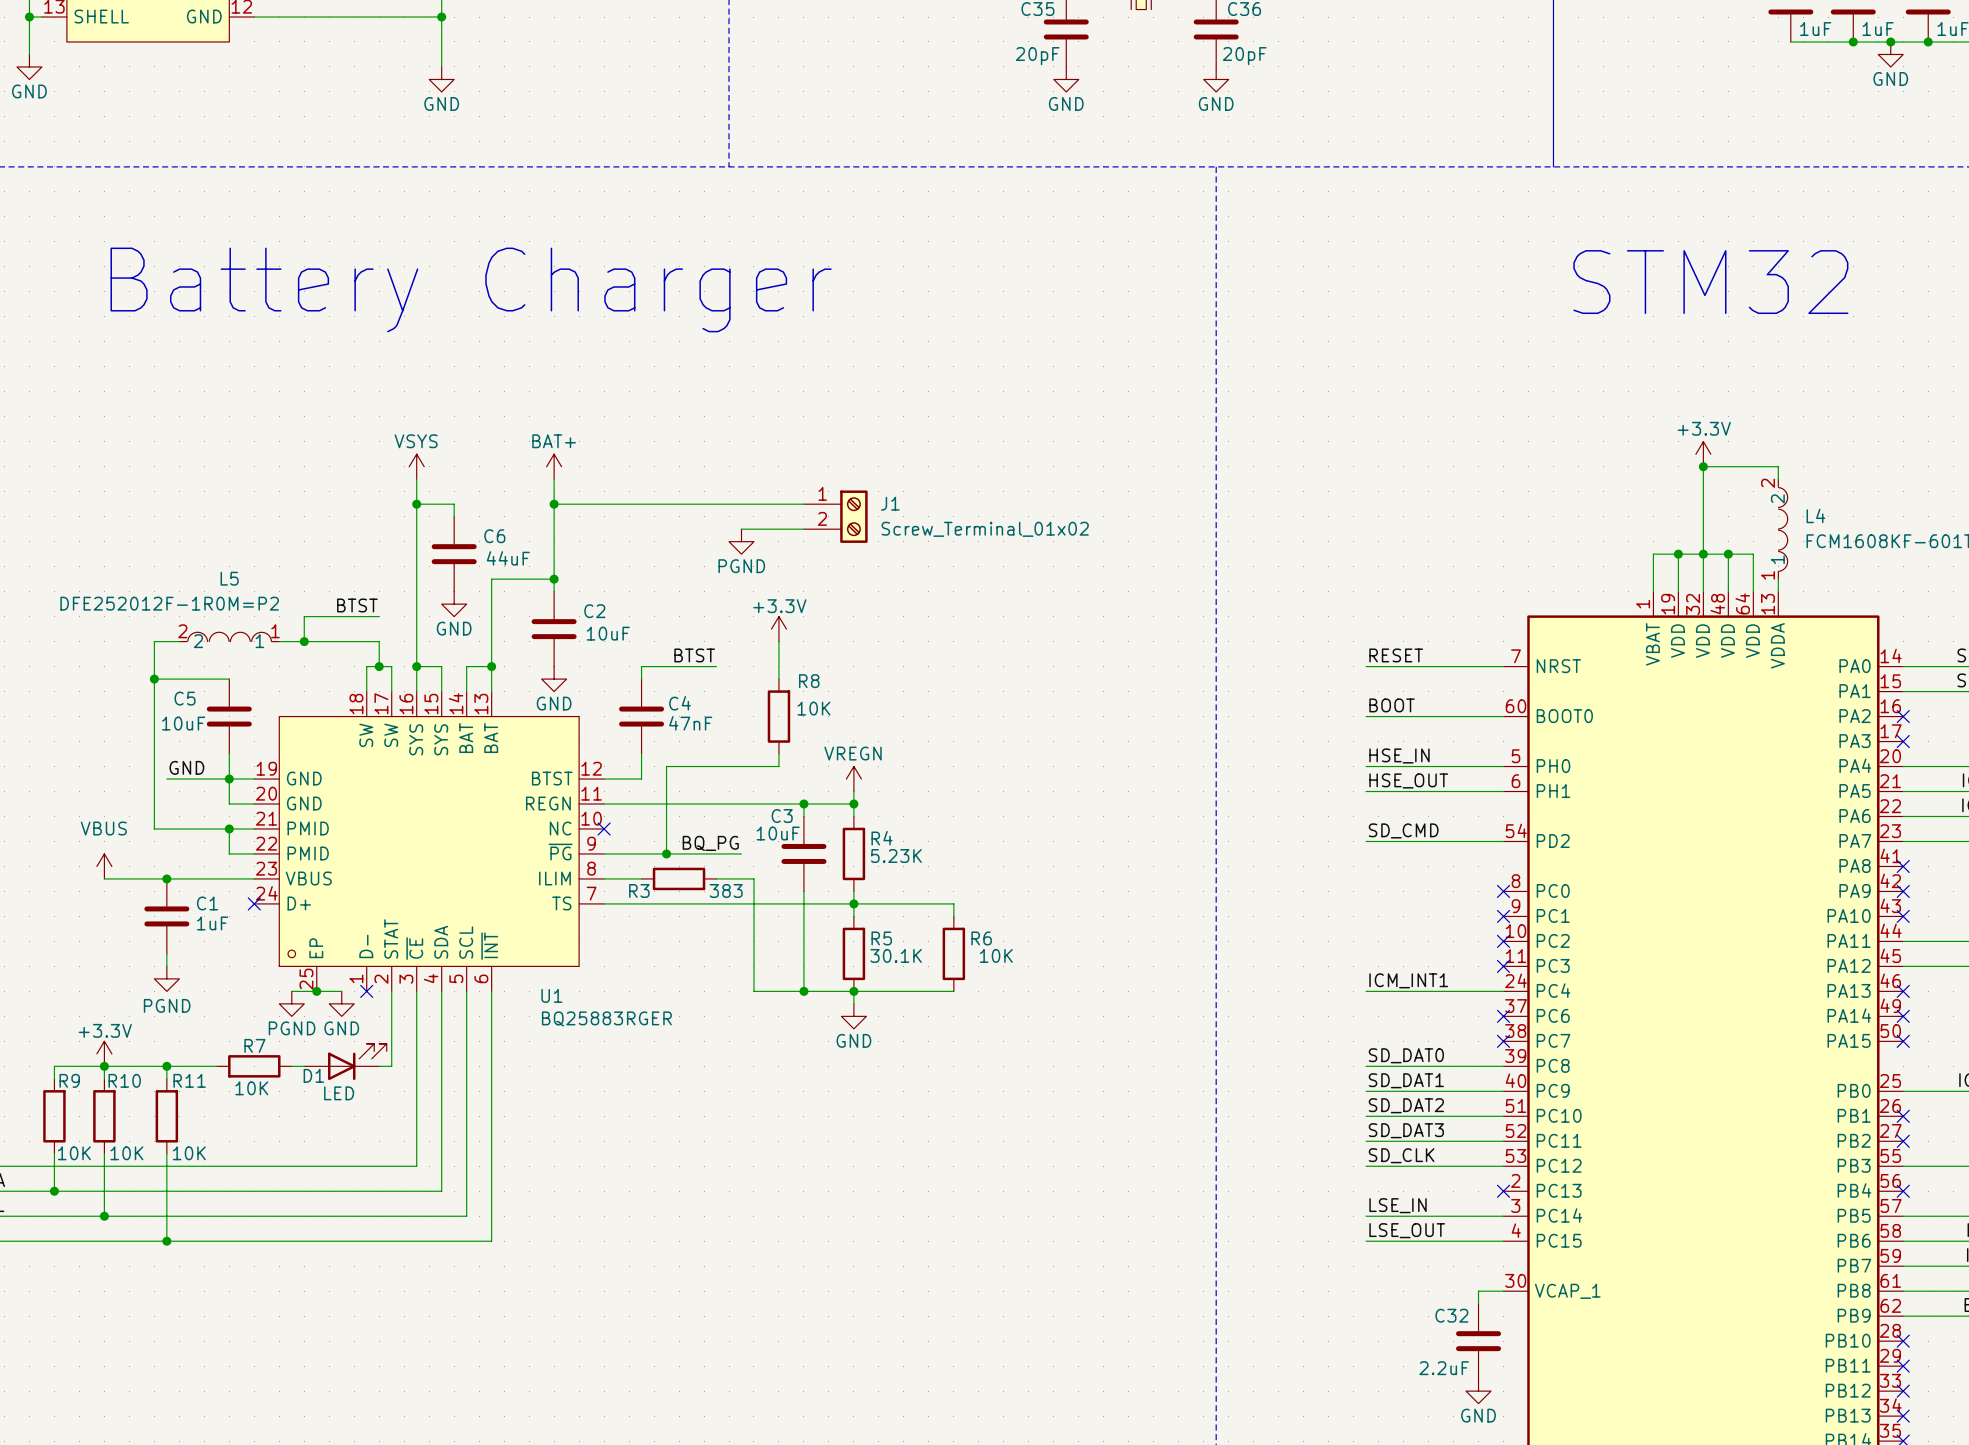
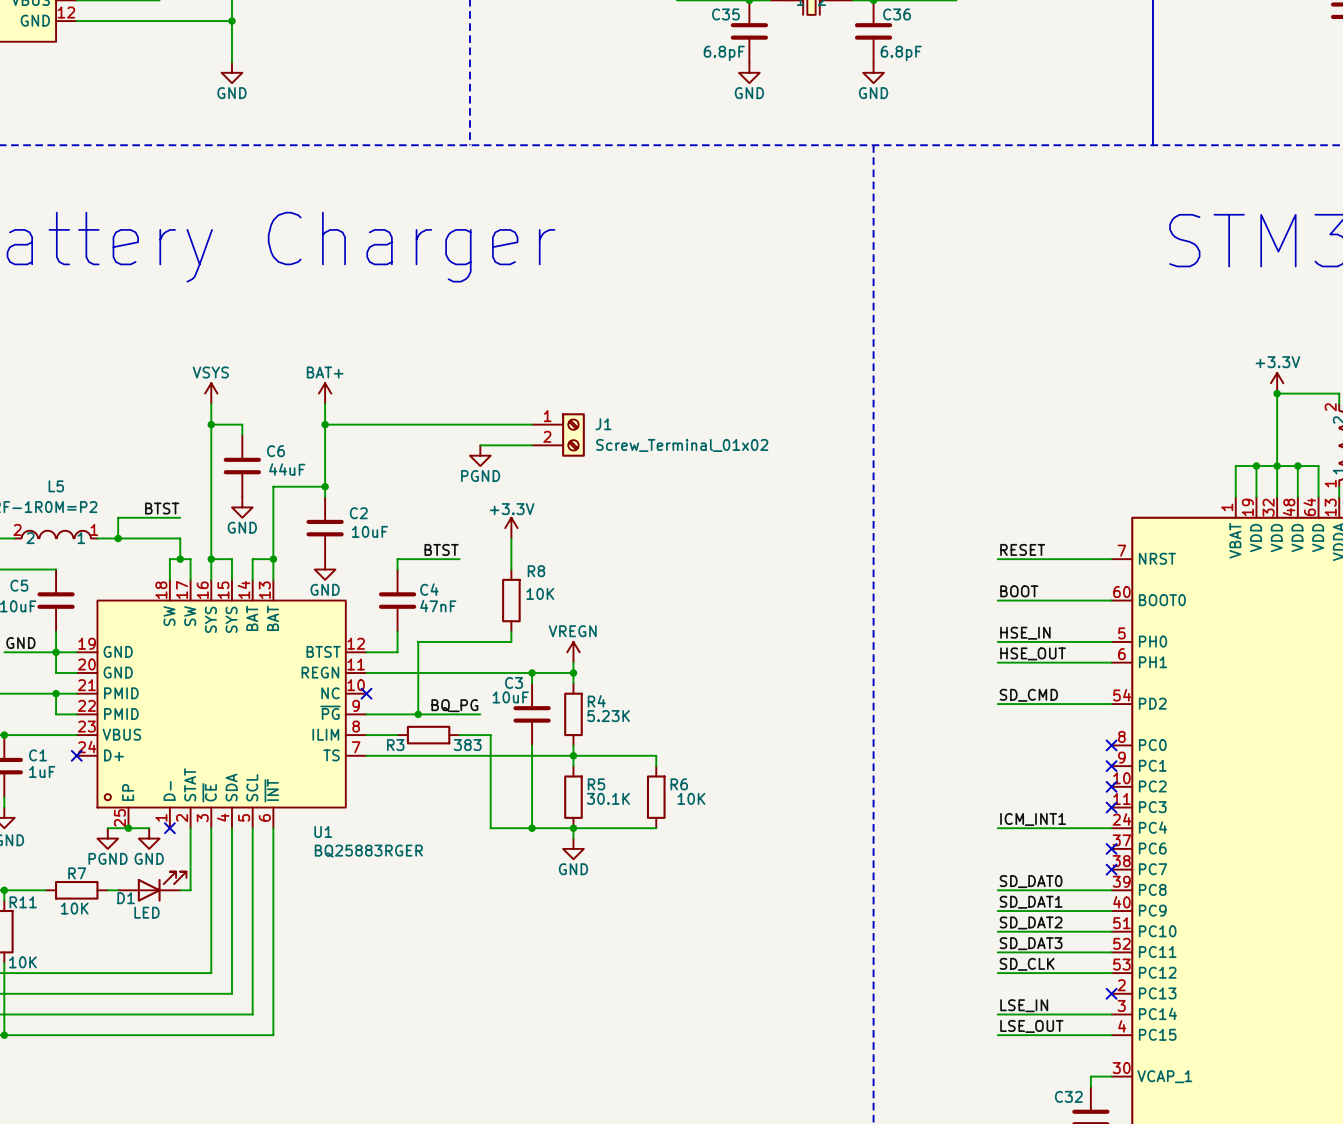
C35 value: 20pF (1037, 56) -> 6.8pF (724, 53)
C36 value: 20pF (1244, 56) -> 6.8pF (901, 53)

